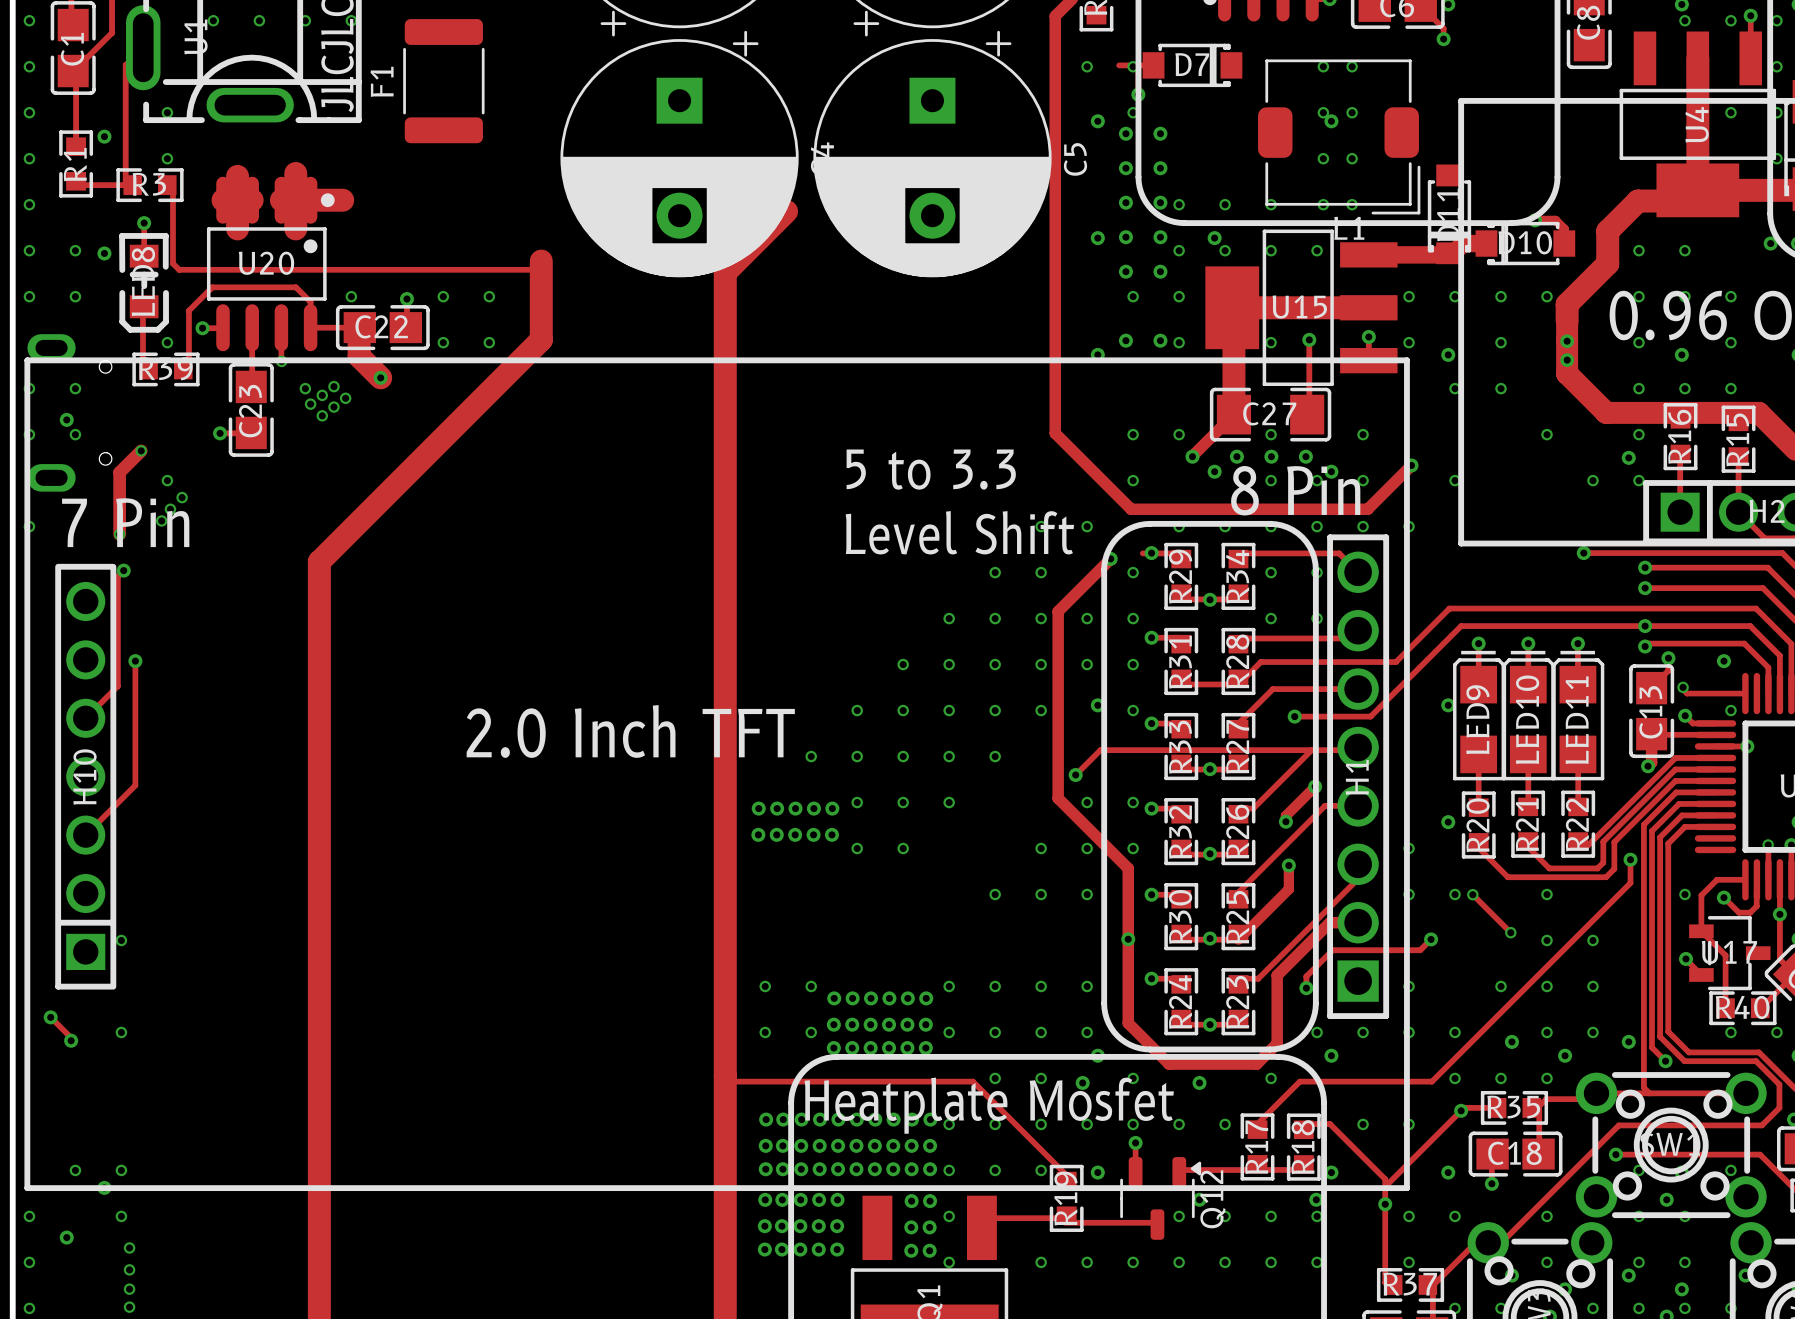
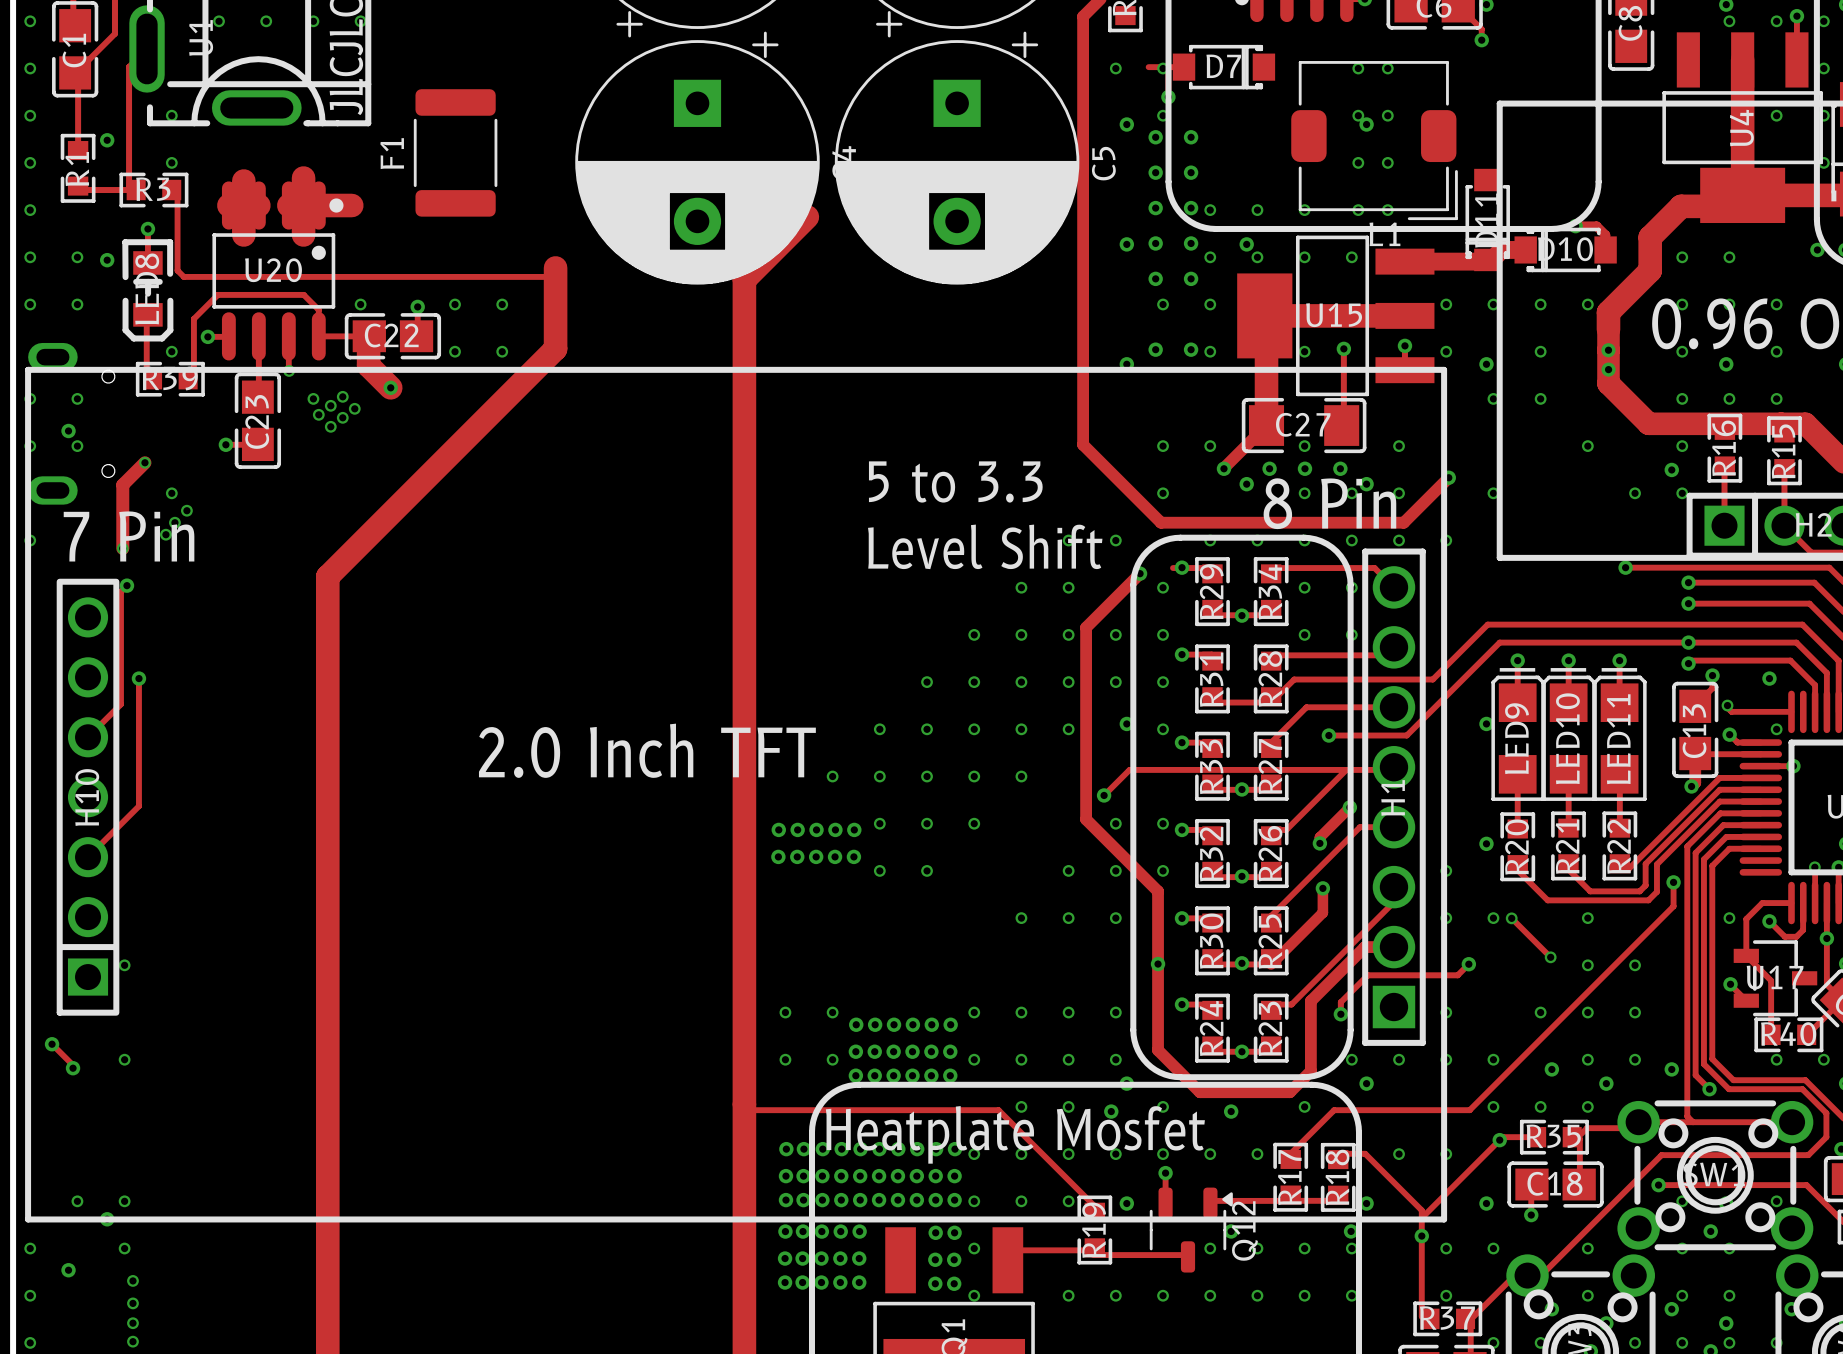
F1 position: (443, 81) -> (455, 152)

